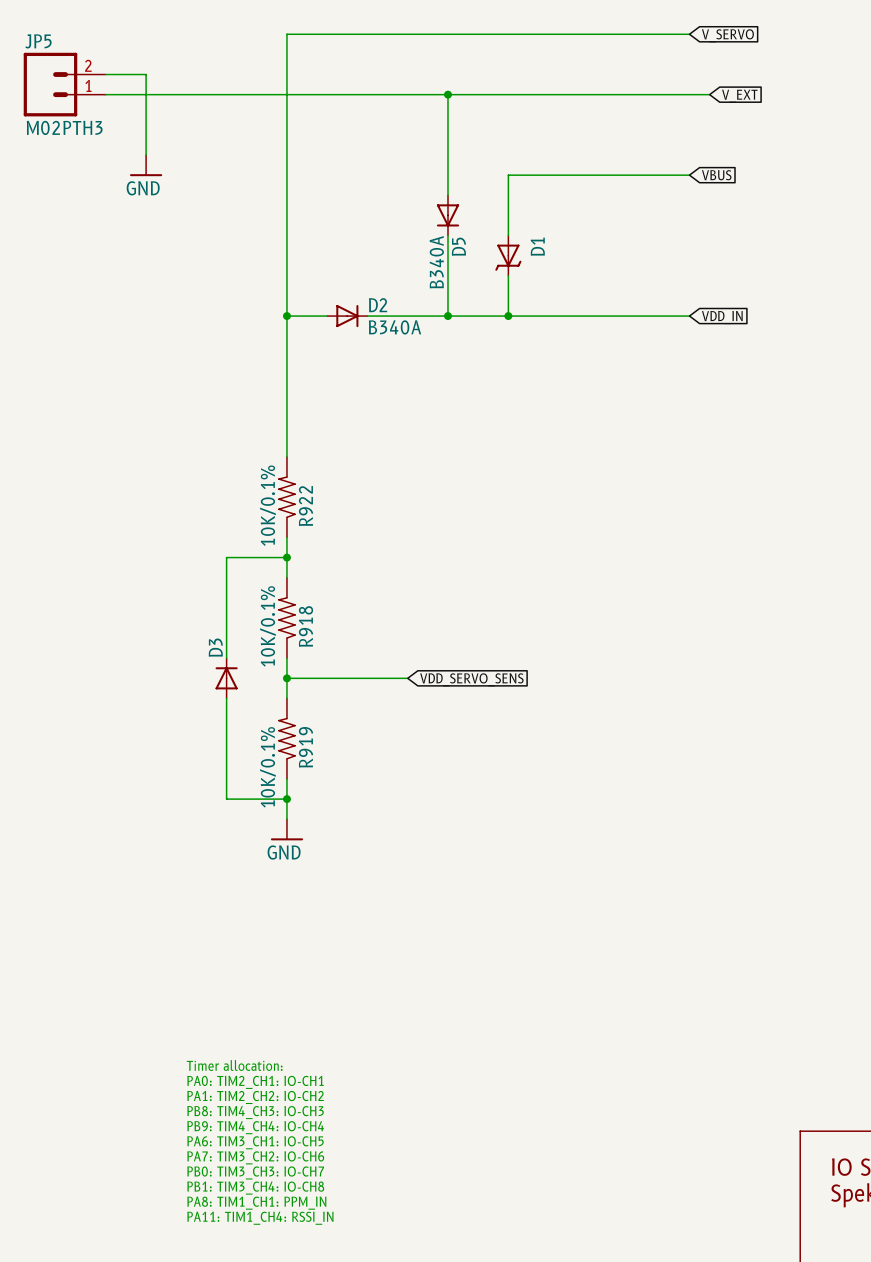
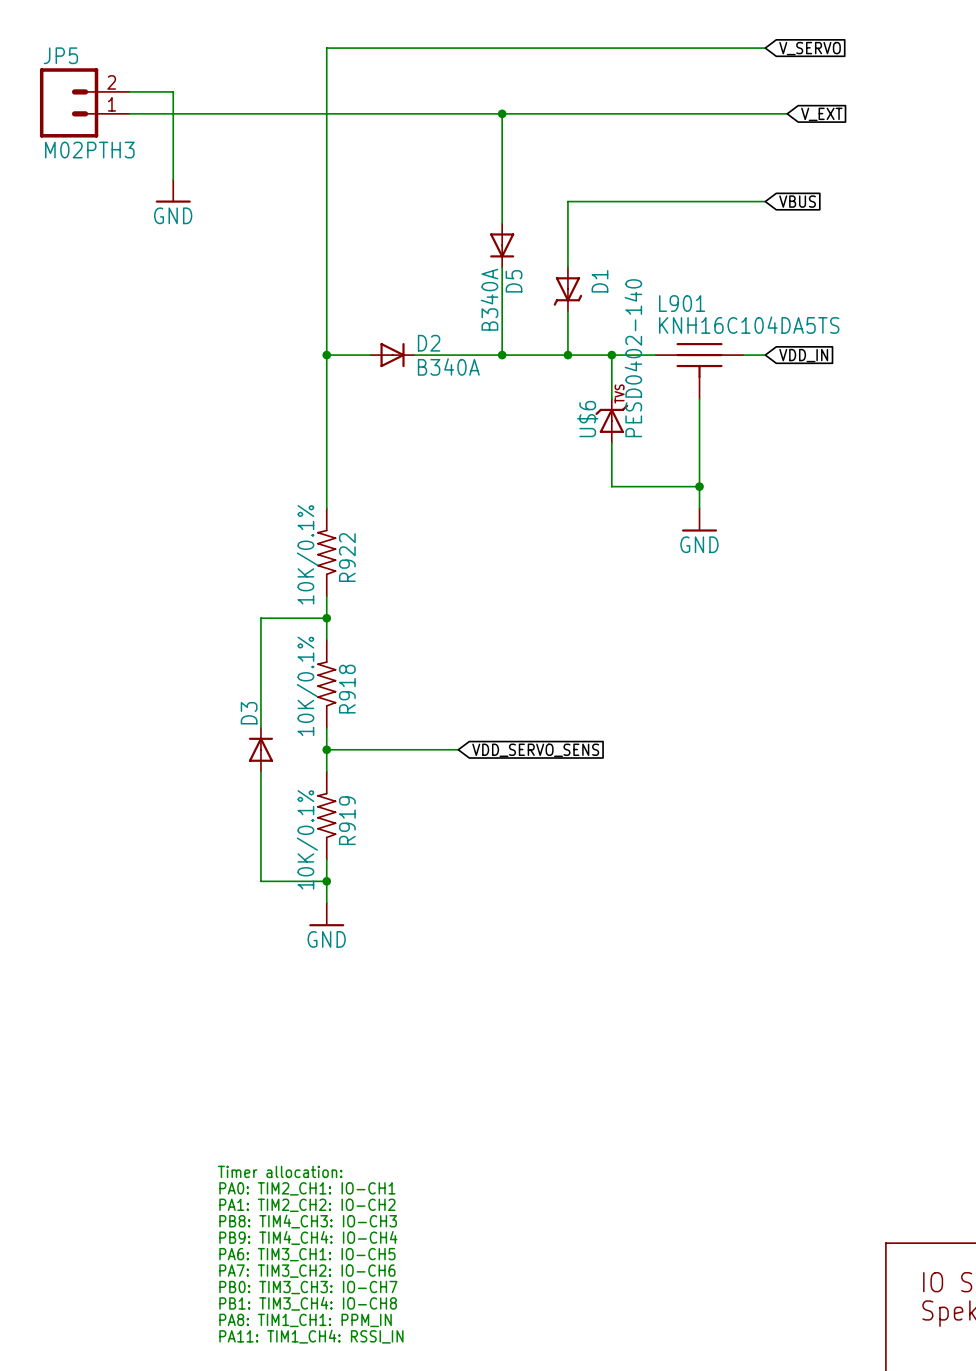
wire: none -> (611, 355) (611, 398)
junction: none -> (611, 355)
L901: none -> KNH16C104DA5TS (699, 370)
wire: none -> (699, 398) (699, 508)
U$6: none -> PESD0402-140 (611, 420)
wire: none -> (611, 442) (611, 486) (699, 486)
junction: none -> (699, 486)
power symbol: none -> GND (699, 520)

